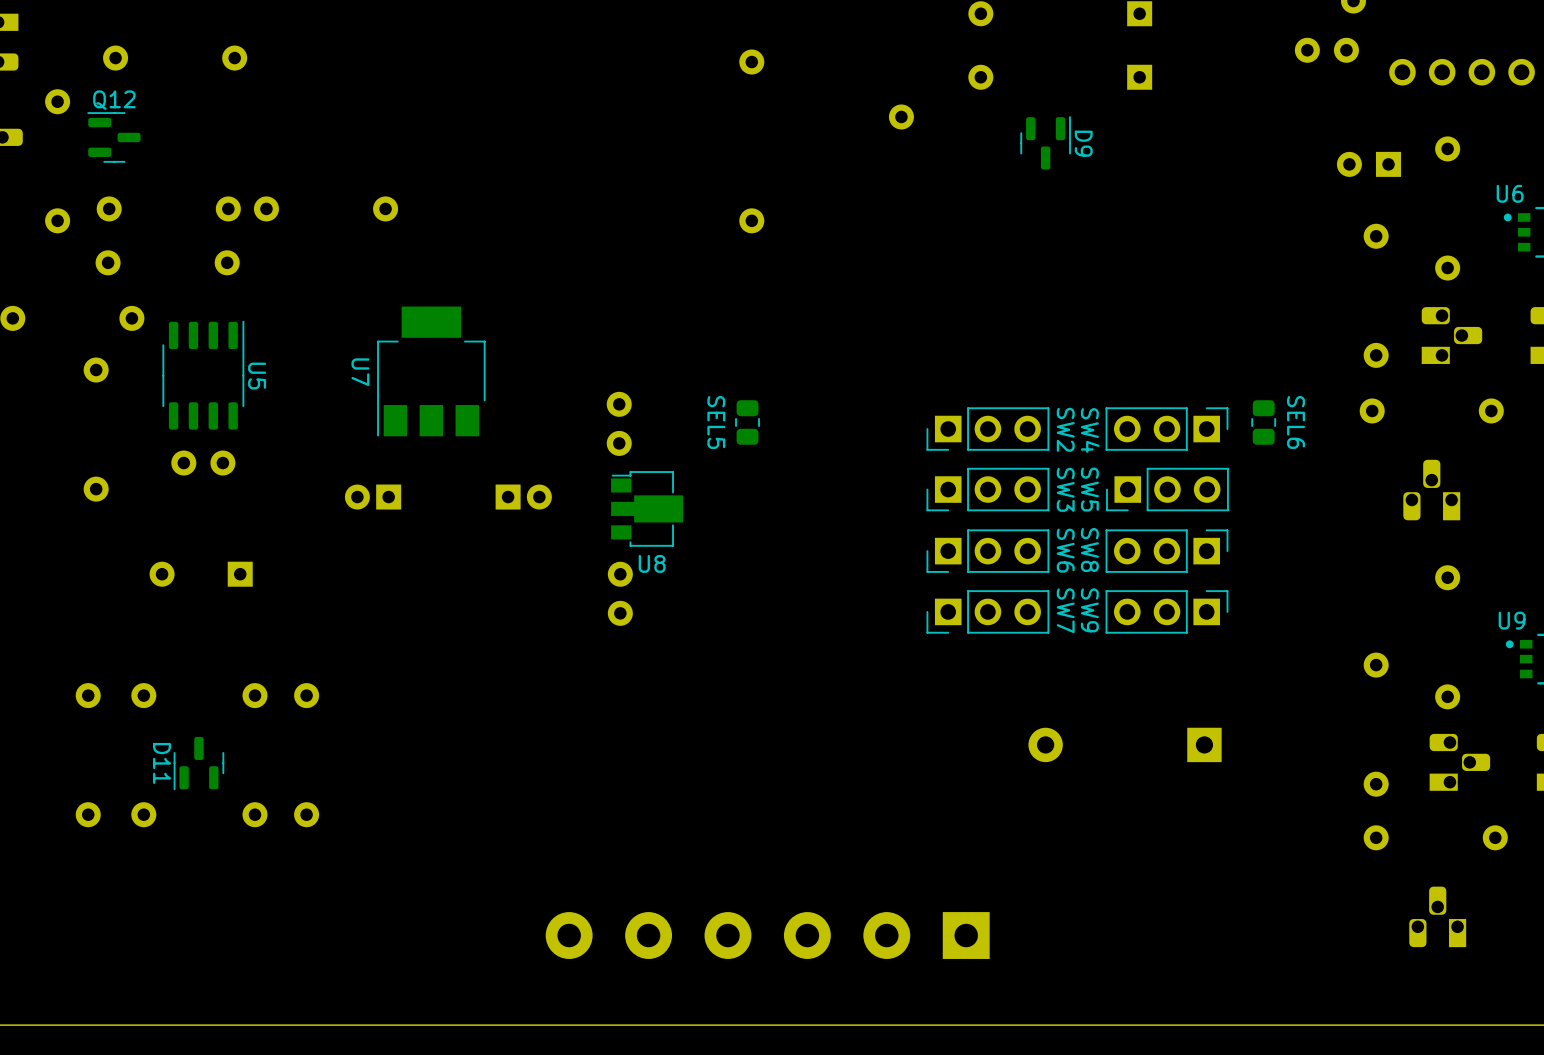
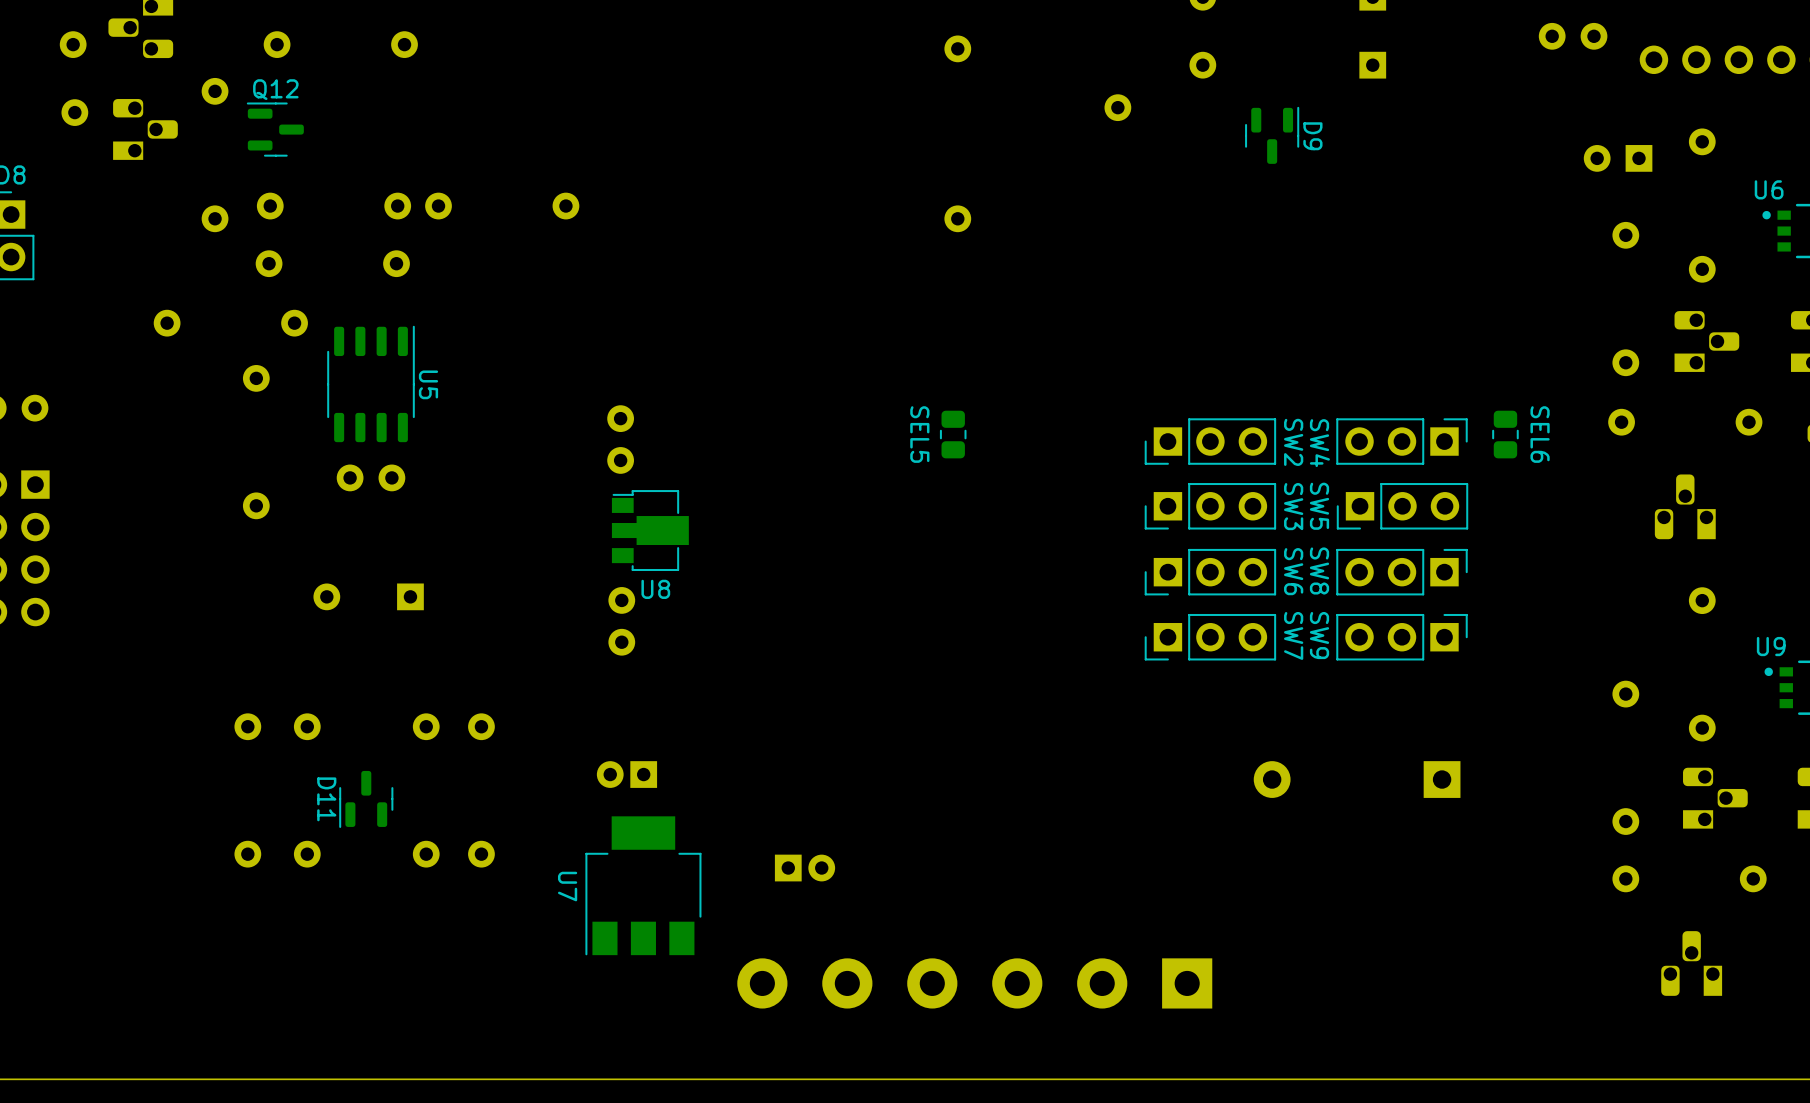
U7 position: (431, 371) -> (643, 885)
part: (619, 423) -> none
part: none -> (620, 439)
part: (373, 497) -> none
part: (523, 497) -> none
U8 position: (647, 508) -> (650, 530)
part: (620, 593) -> none
part: none -> (621, 621)
part: none -> (626, 774)
part: none -> (805, 868)

